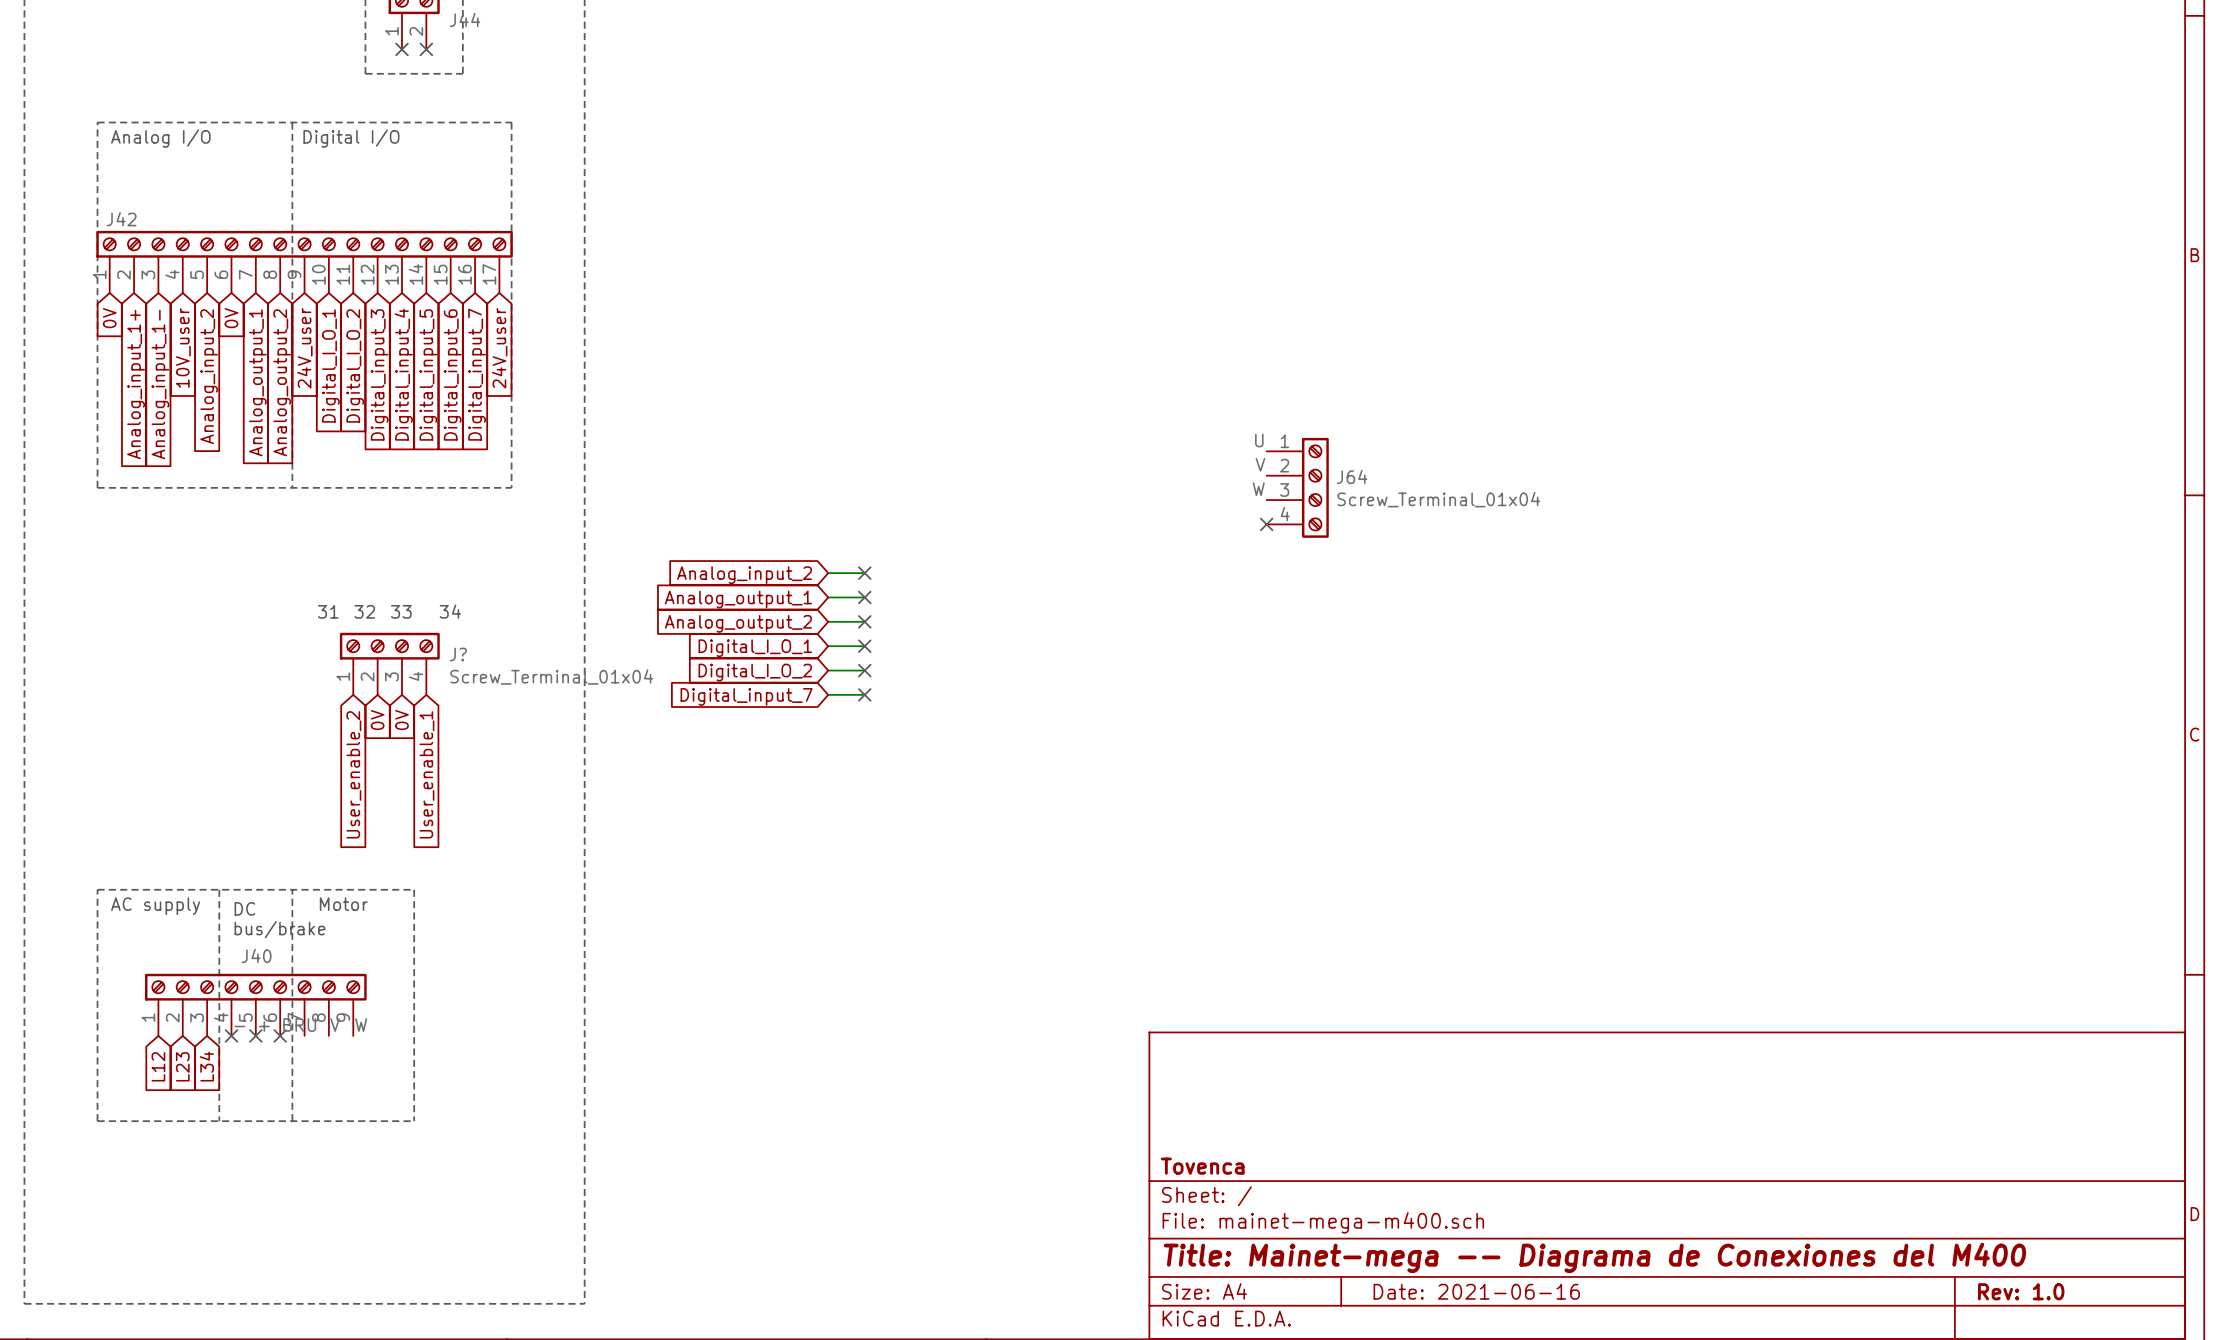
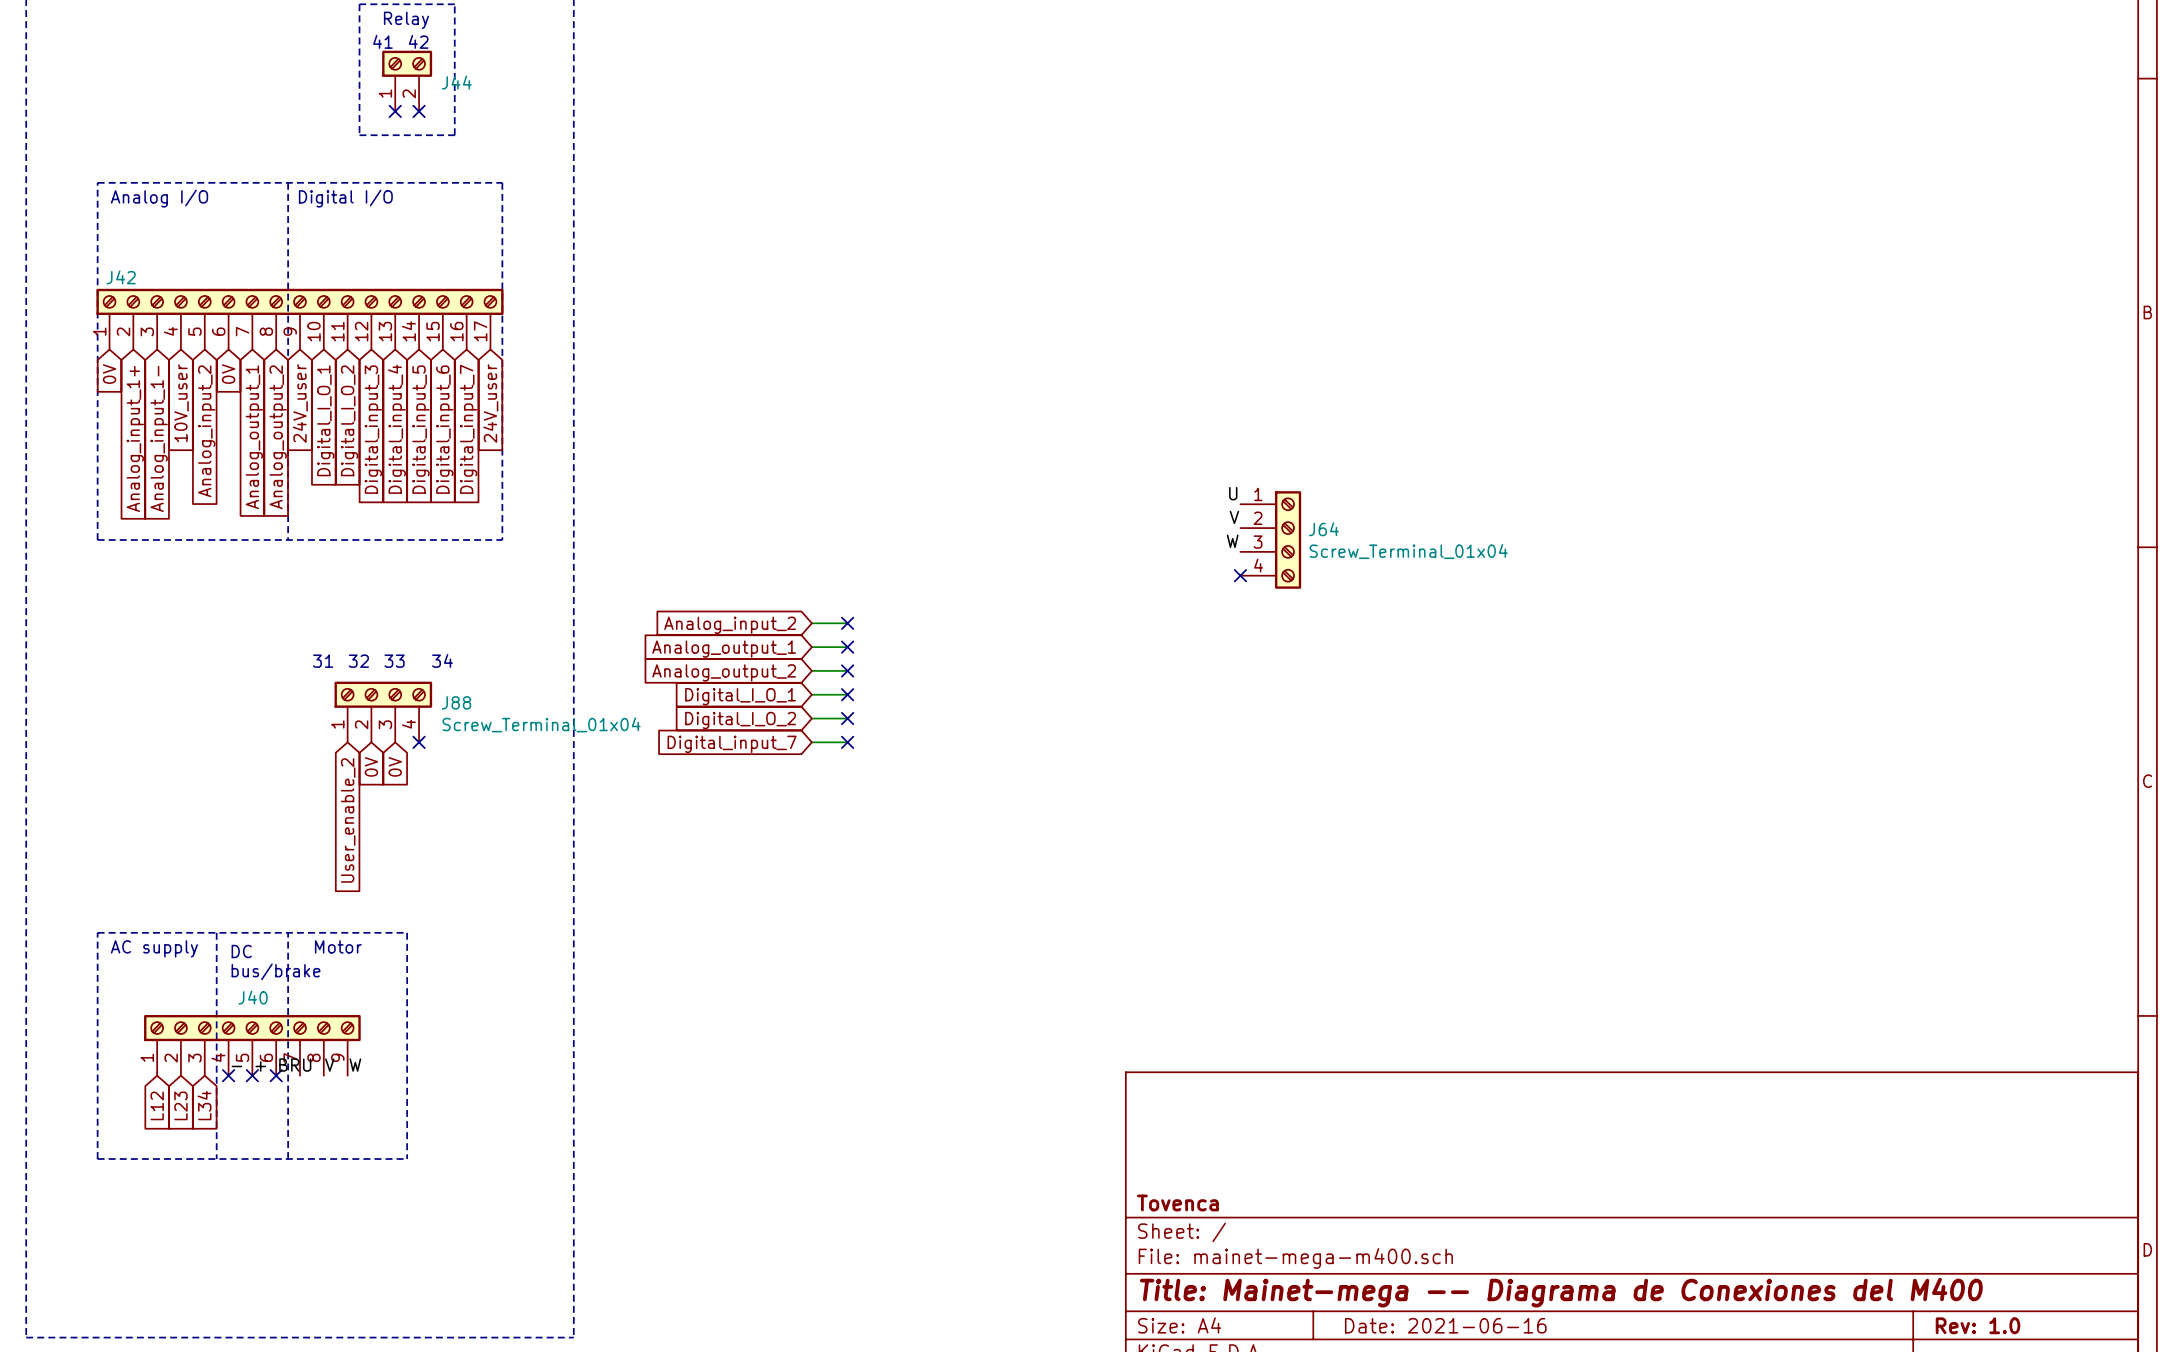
J? name: J? (458, 654) -> J88 (456, 702)
no-connect mark: none -> (419, 742)
global label: User_enable_1 (426, 774) -> none

